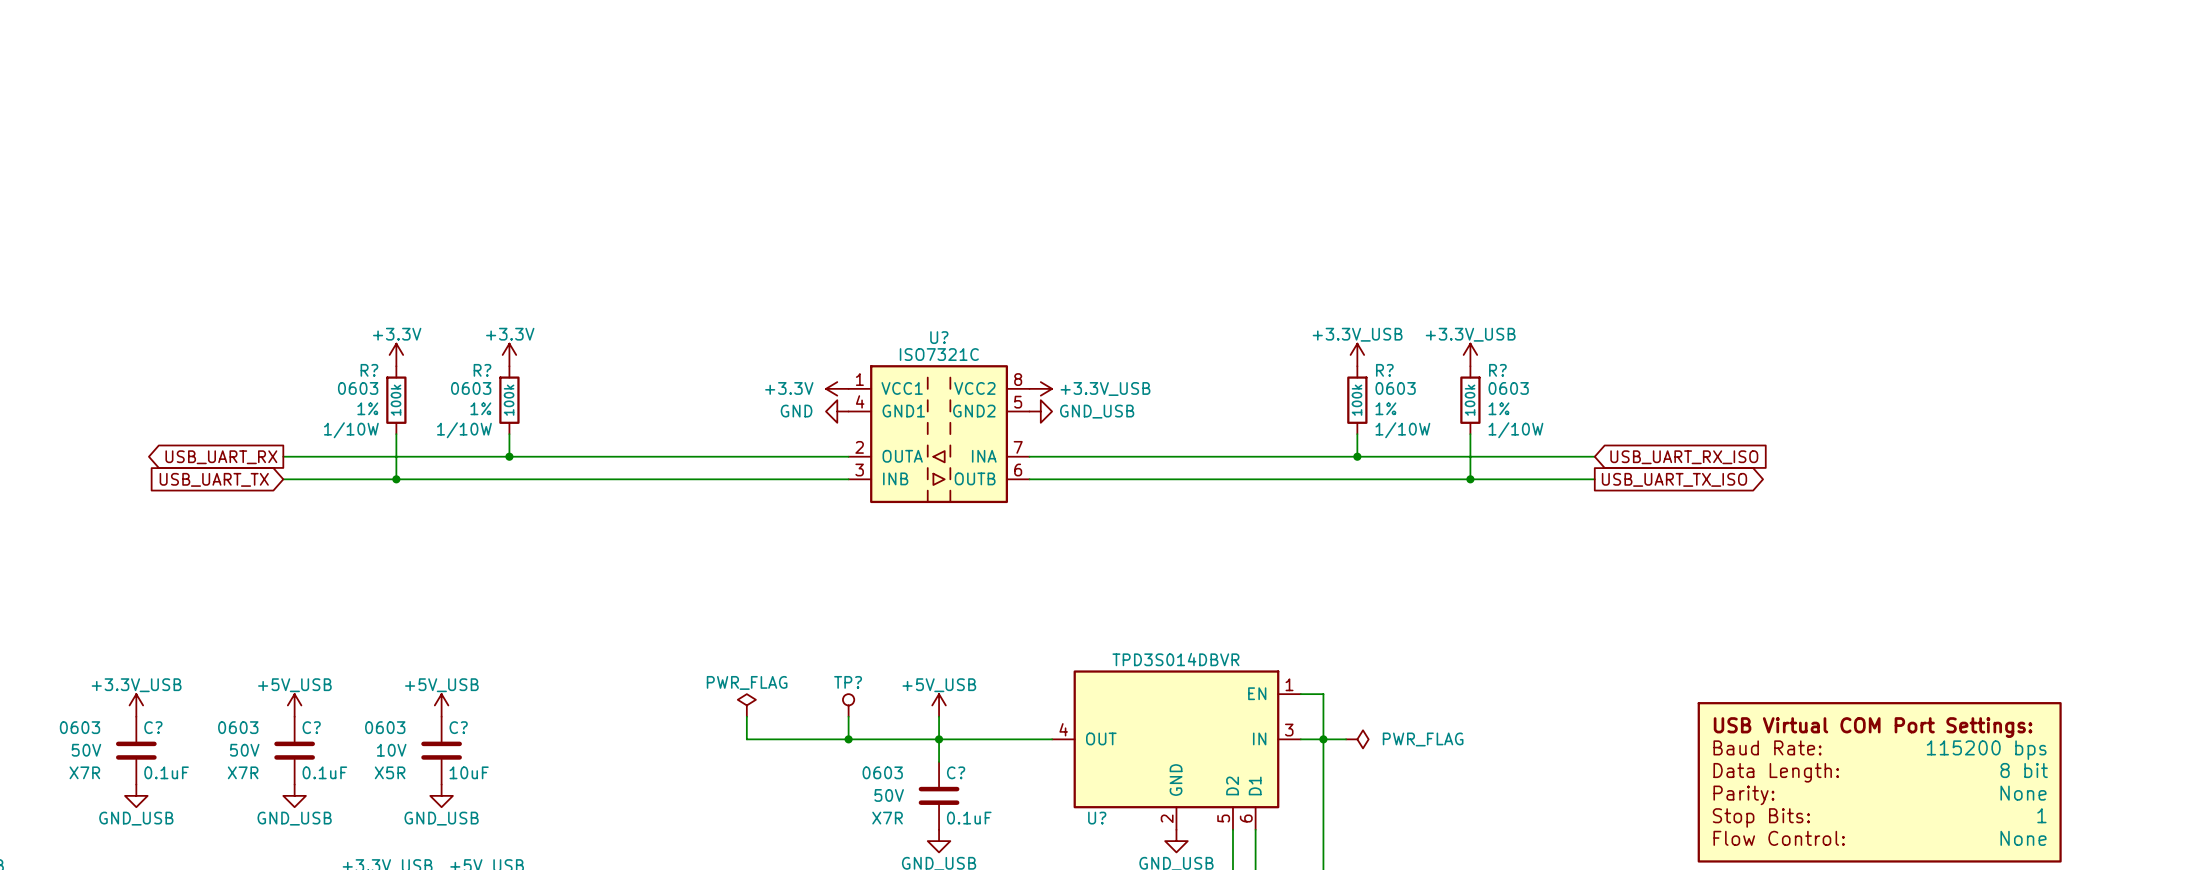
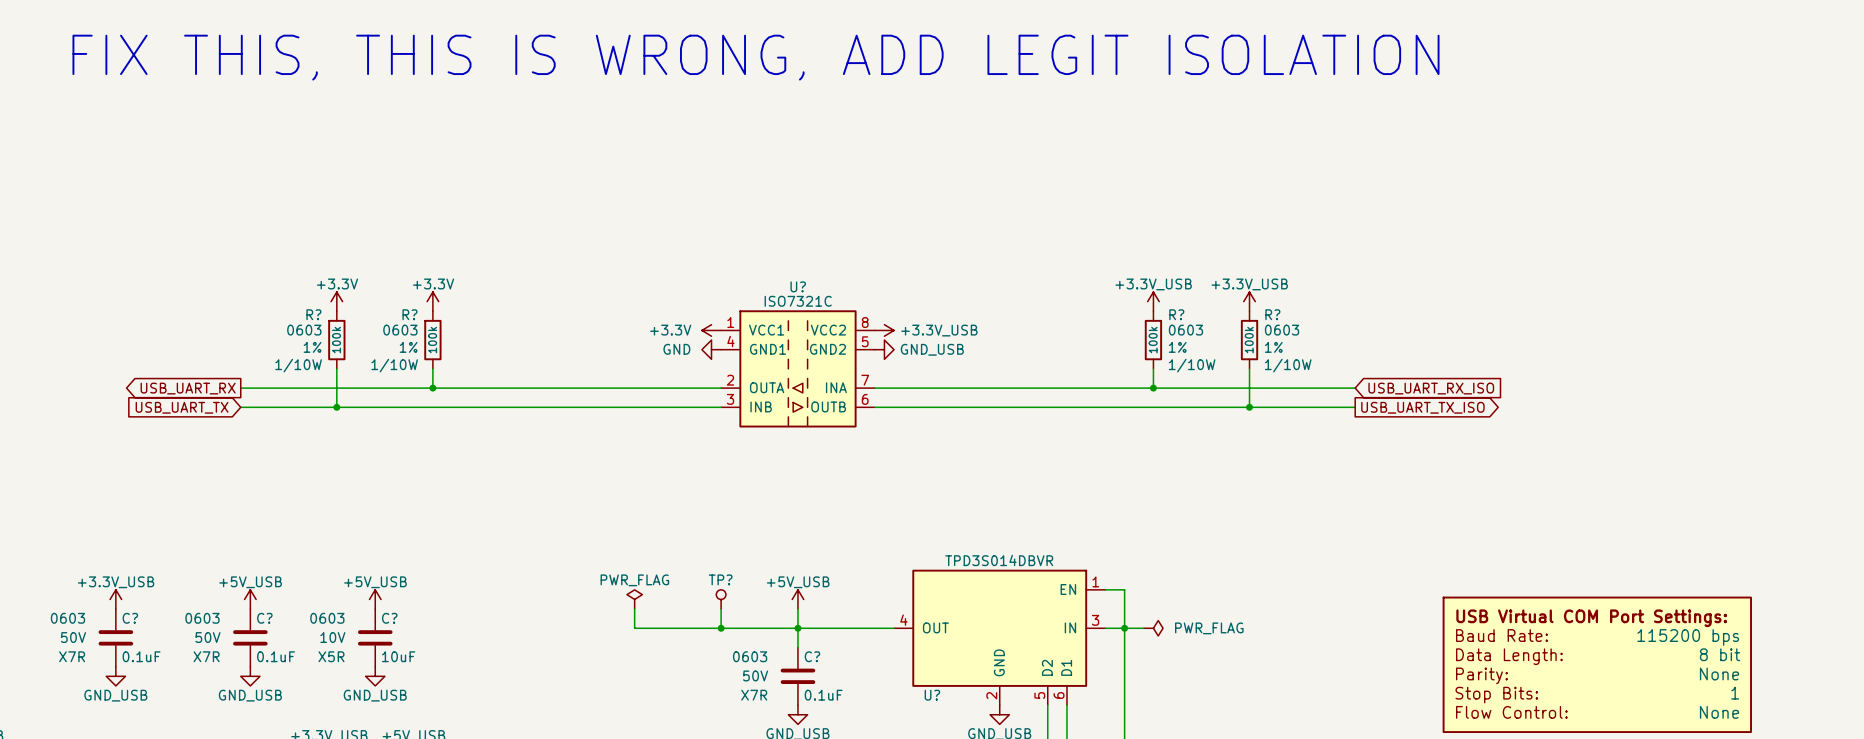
text: none -> FIX THIS, THIS IS WRONG, ADD LEGIT ISOLATION (756, 57)

